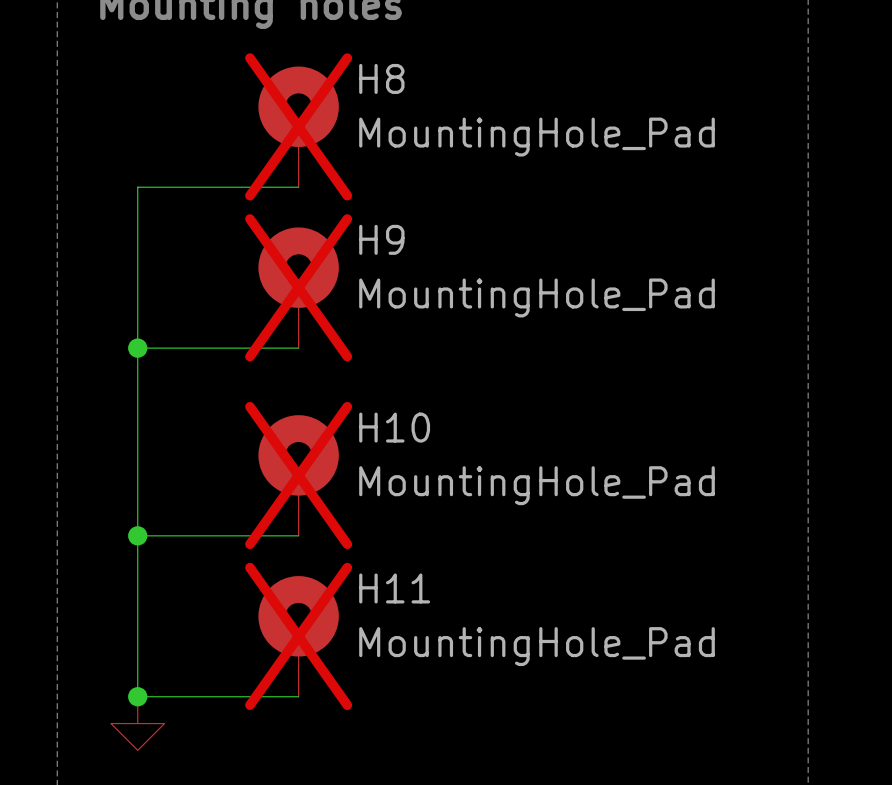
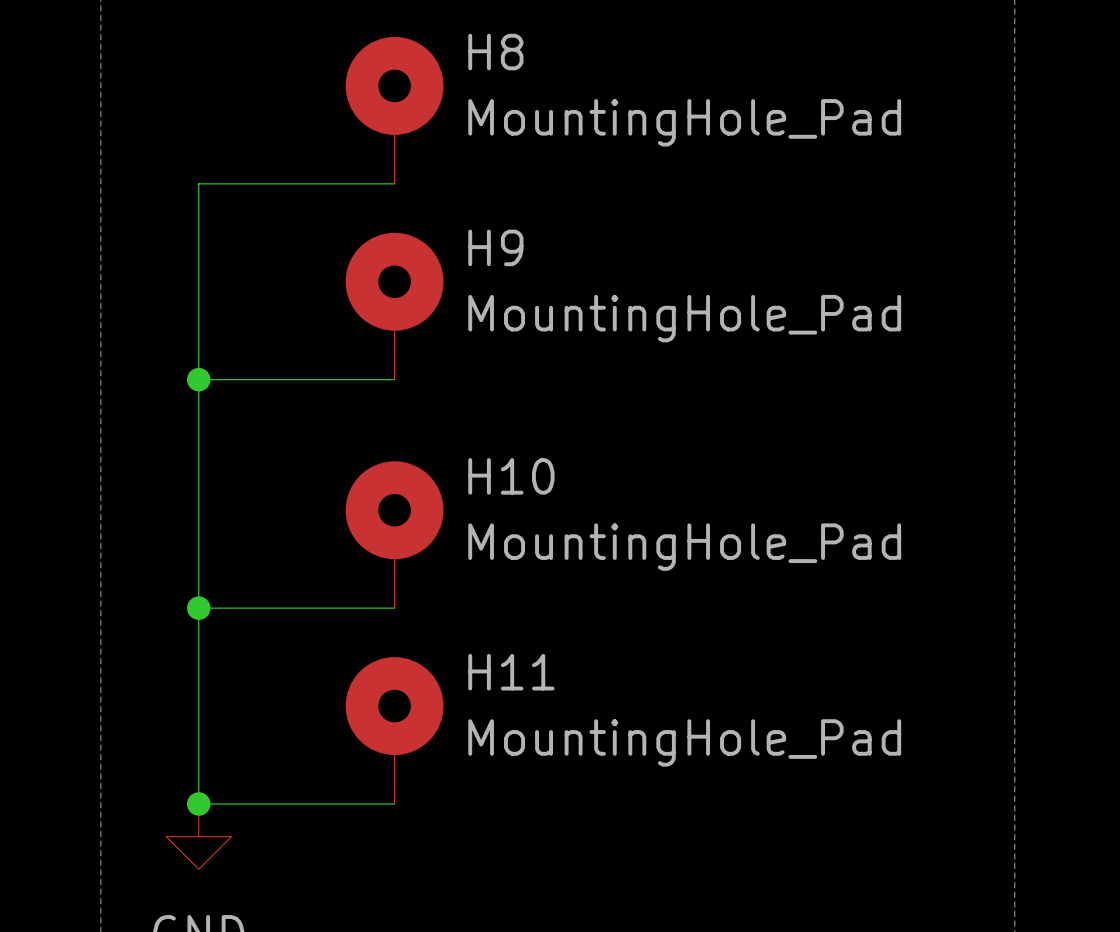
H8 do-not-place cross: (298, 126) -> none
H9 do-not-place cross: (298, 287) -> none
H10 do-not-place cross: (298, 475) -> none
H11 do-not-place cross: (298, 636) -> none

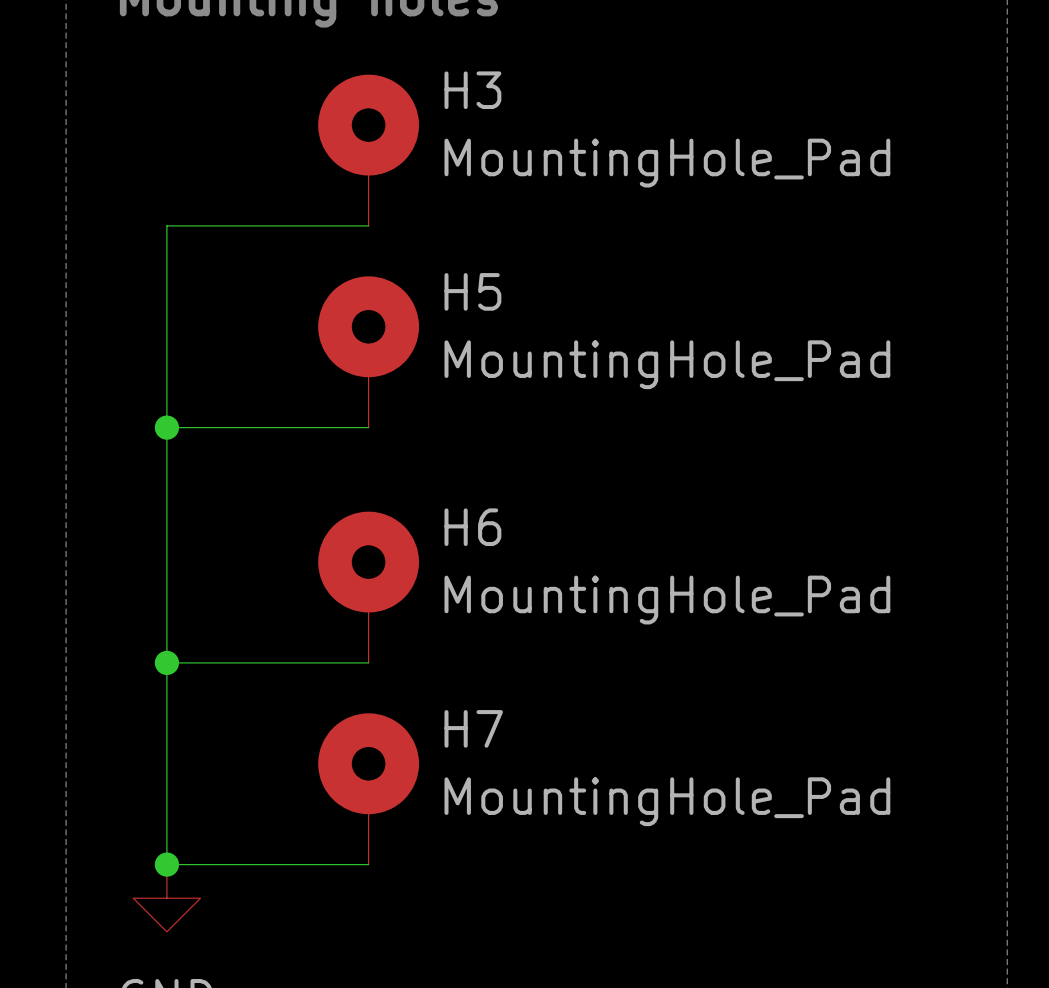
H8 name: H8 (495, 52) -> H3 (472, 90)
H9 name: H9 (495, 247) -> H5 (472, 291)
H10 name: H10 (511, 476) -> H6 (472, 527)
H11 name: H11 (511, 672) -> H7 (473, 728)

